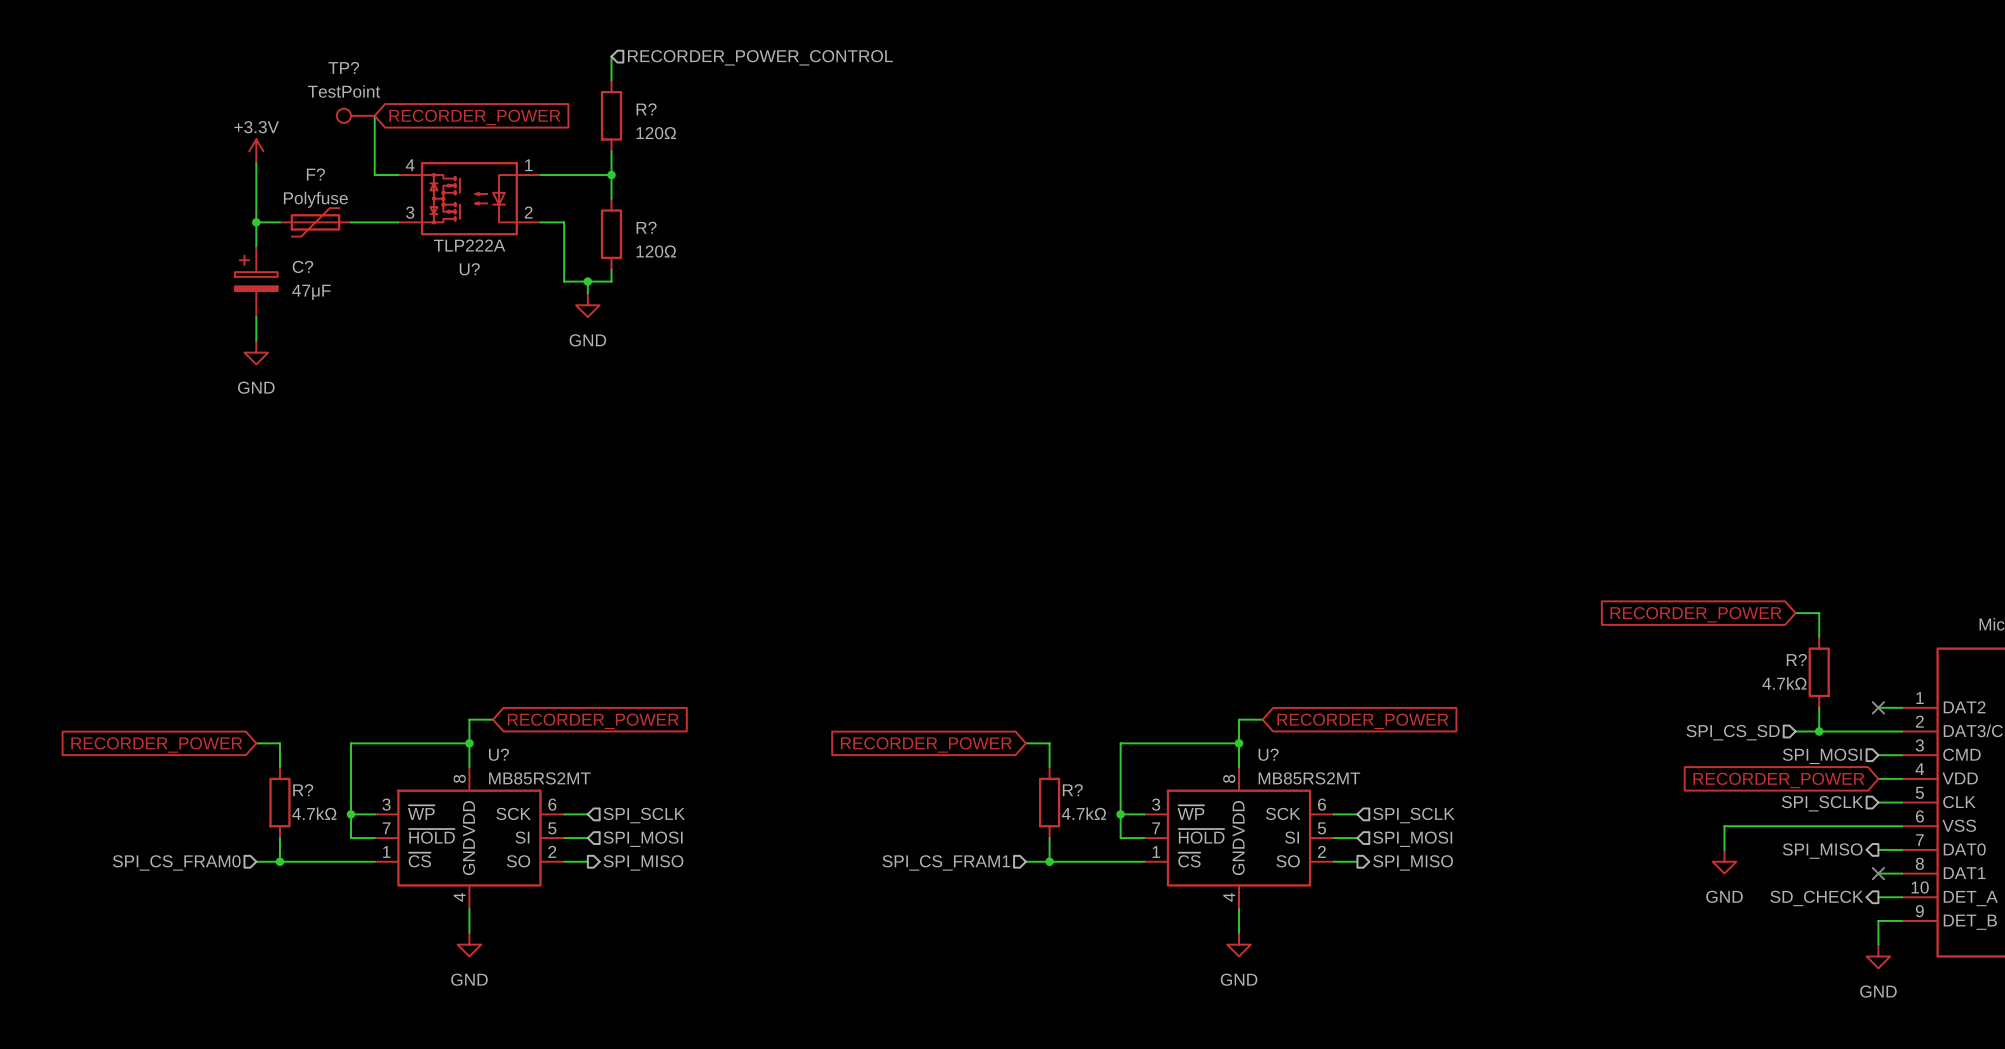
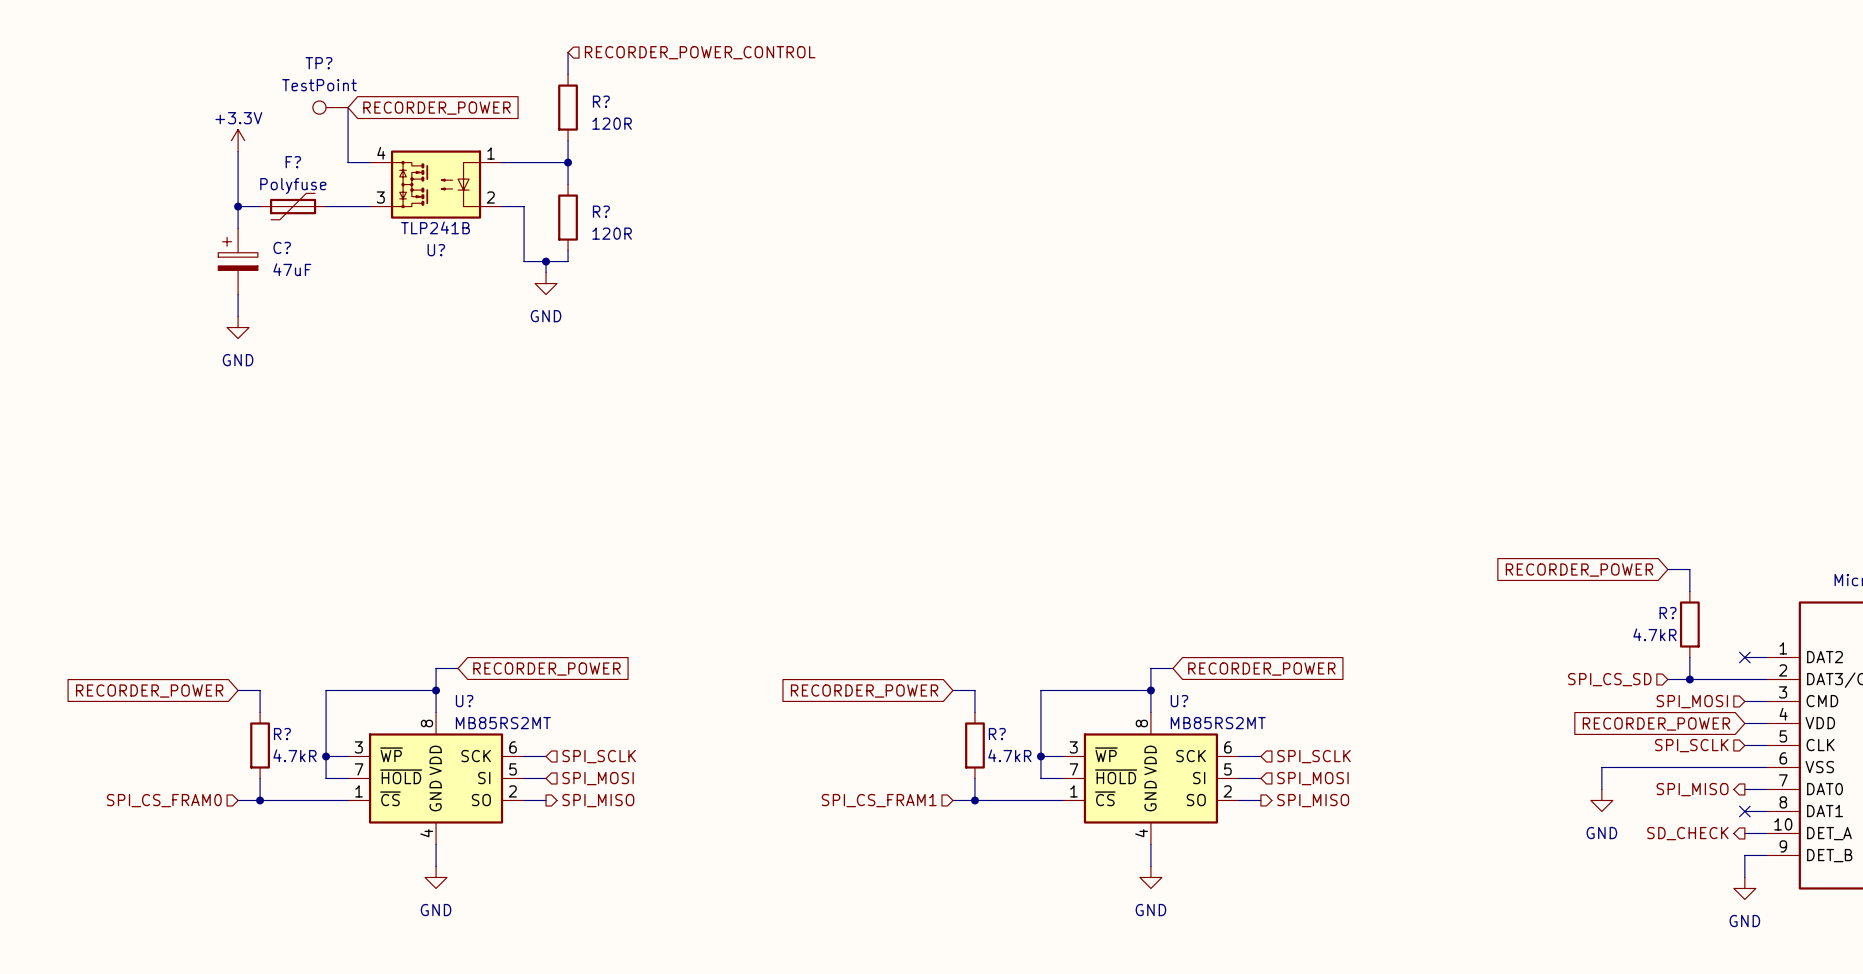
R? value: 120Ω (656, 133) -> 120R (612, 123)
U? value: TLP222A (469, 245) -> TLP241B (435, 227)
R? value: 120Ω (656, 251) -> 120R (612, 233)
C? value: 47μF (311, 292) -> 47uF (292, 269)
R? value: 4.7kΩ (1784, 683) -> 4.7kR (1654, 634)
R? value: 4.7kΩ (314, 813) -> 4.7kR (294, 755)
R? value: 4.7kΩ (1083, 813) -> 4.7kR (1009, 755)

